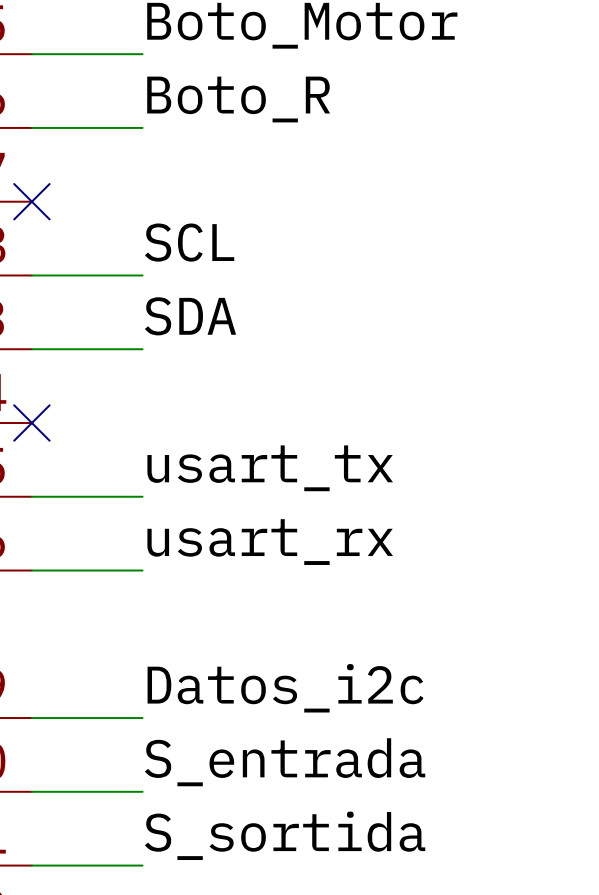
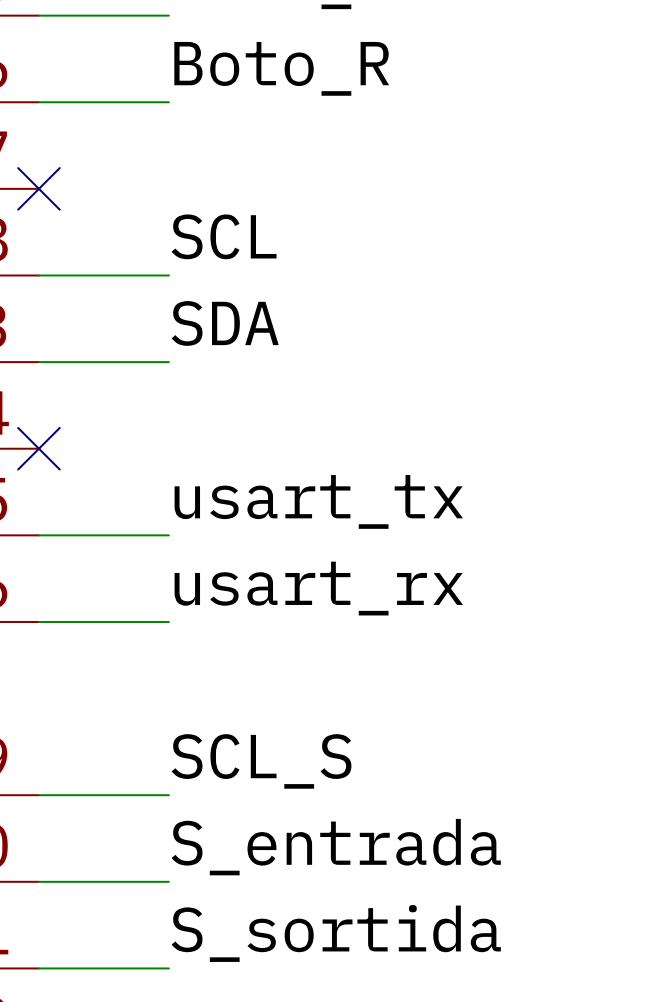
label: Datos_i2c (285, 688) -> SCL_S (261, 761)

